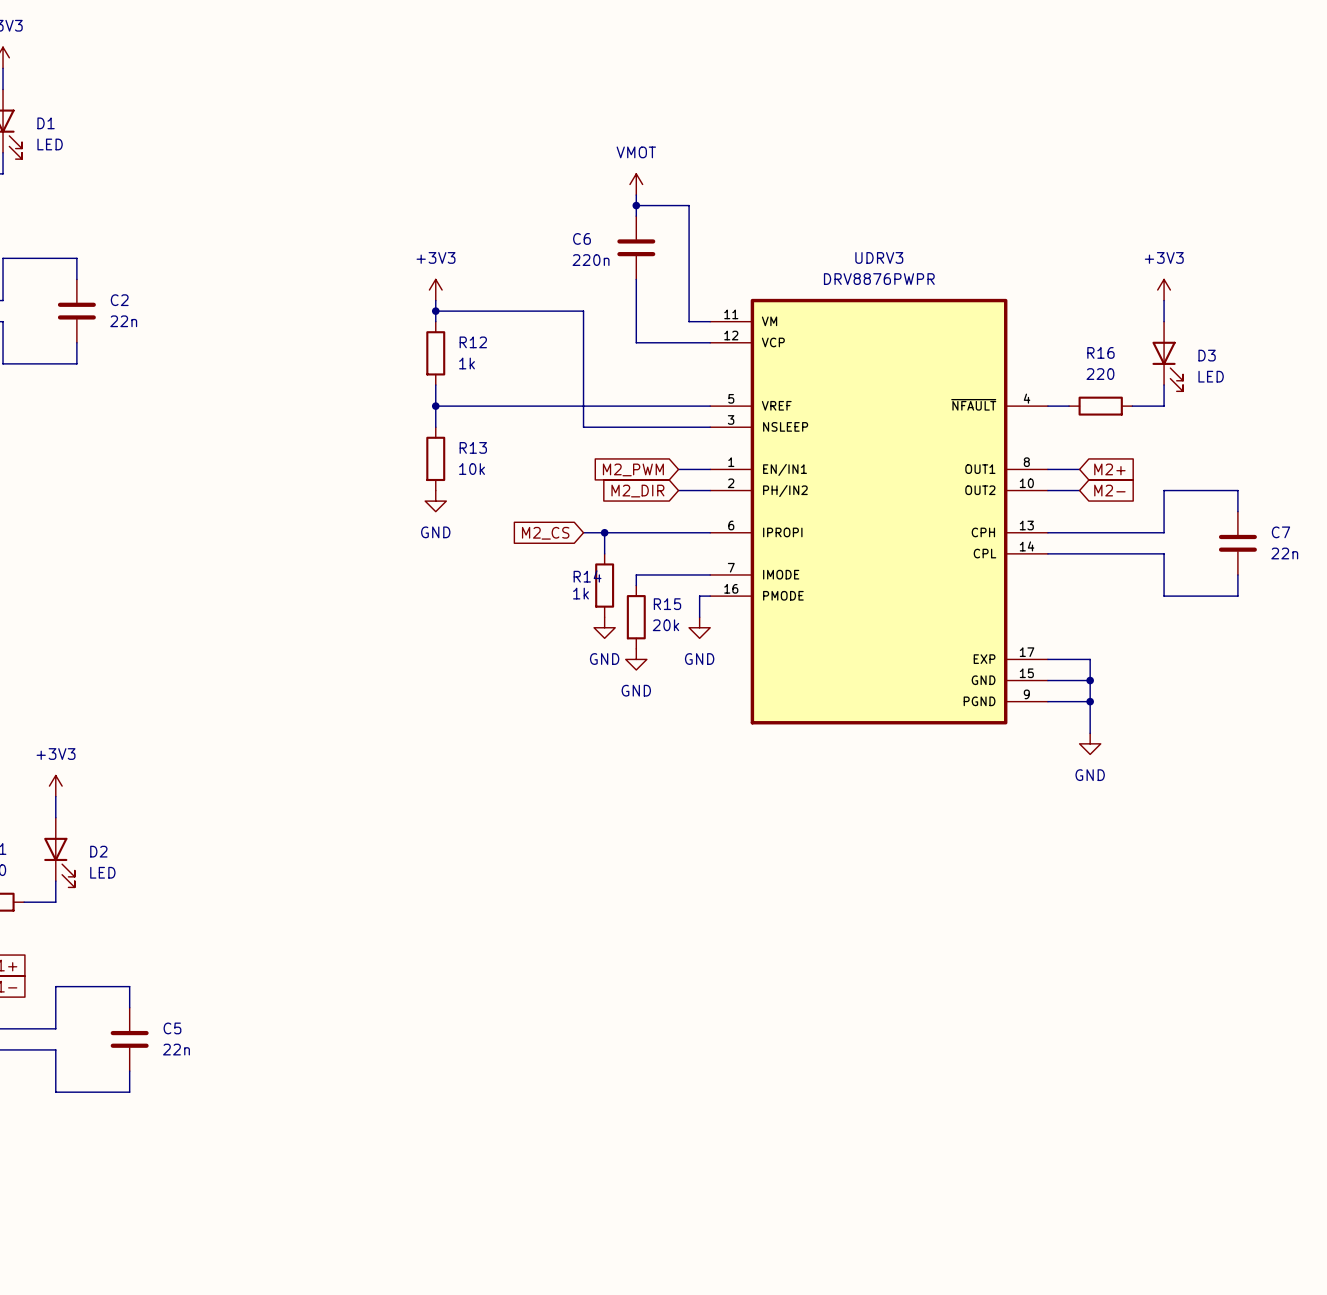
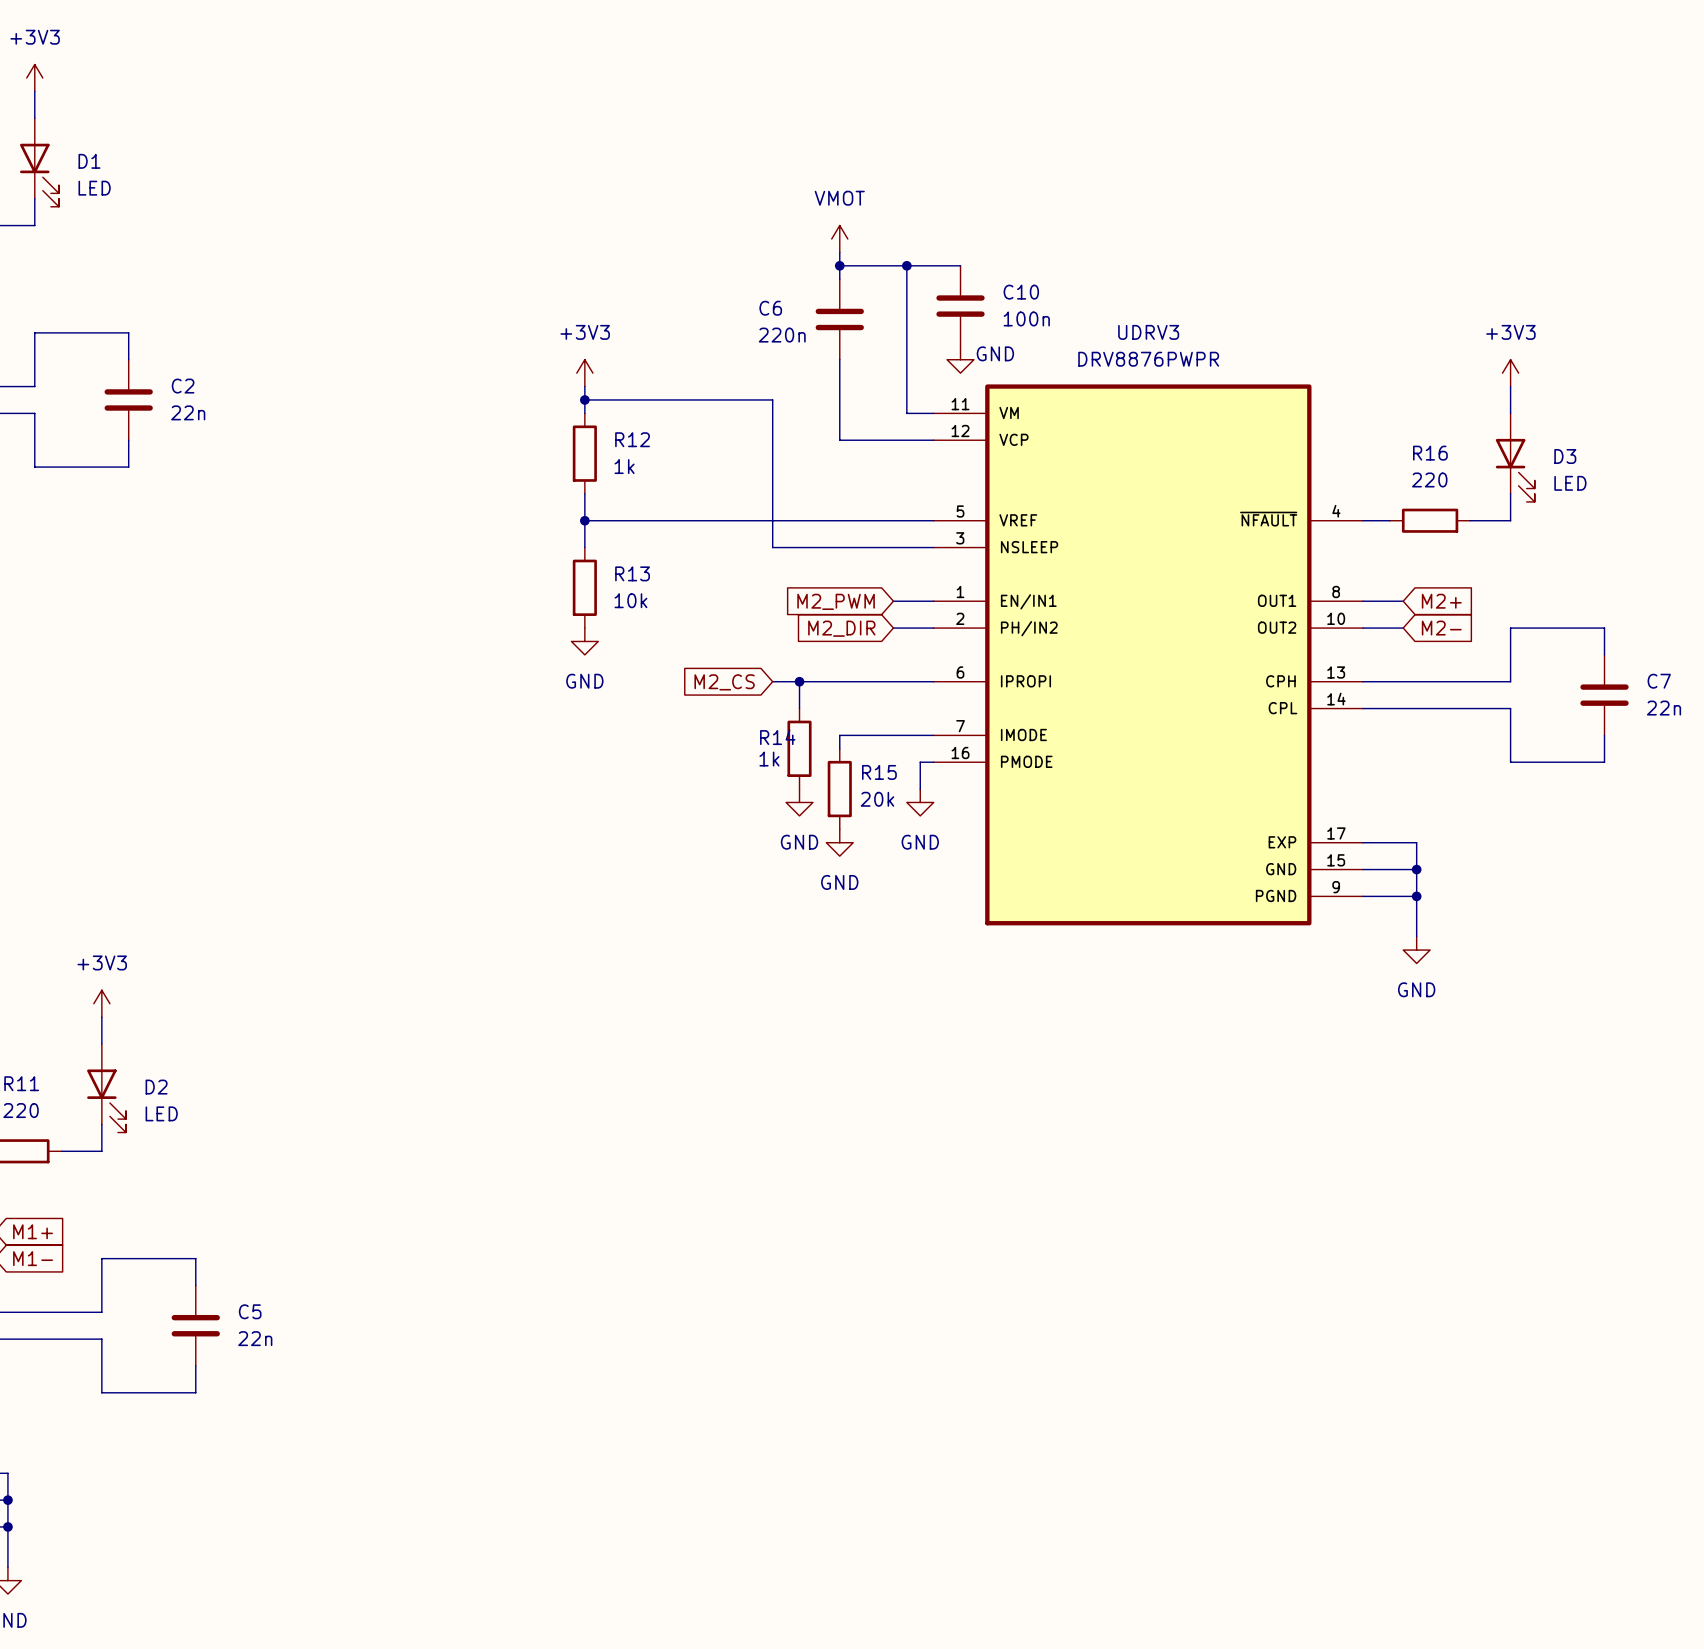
wire: none -> (906, 265) (960, 265)
junction: none -> (906, 265)
C10: none -> 100n (960, 306)
power symbol: none -> GND (960, 359)

